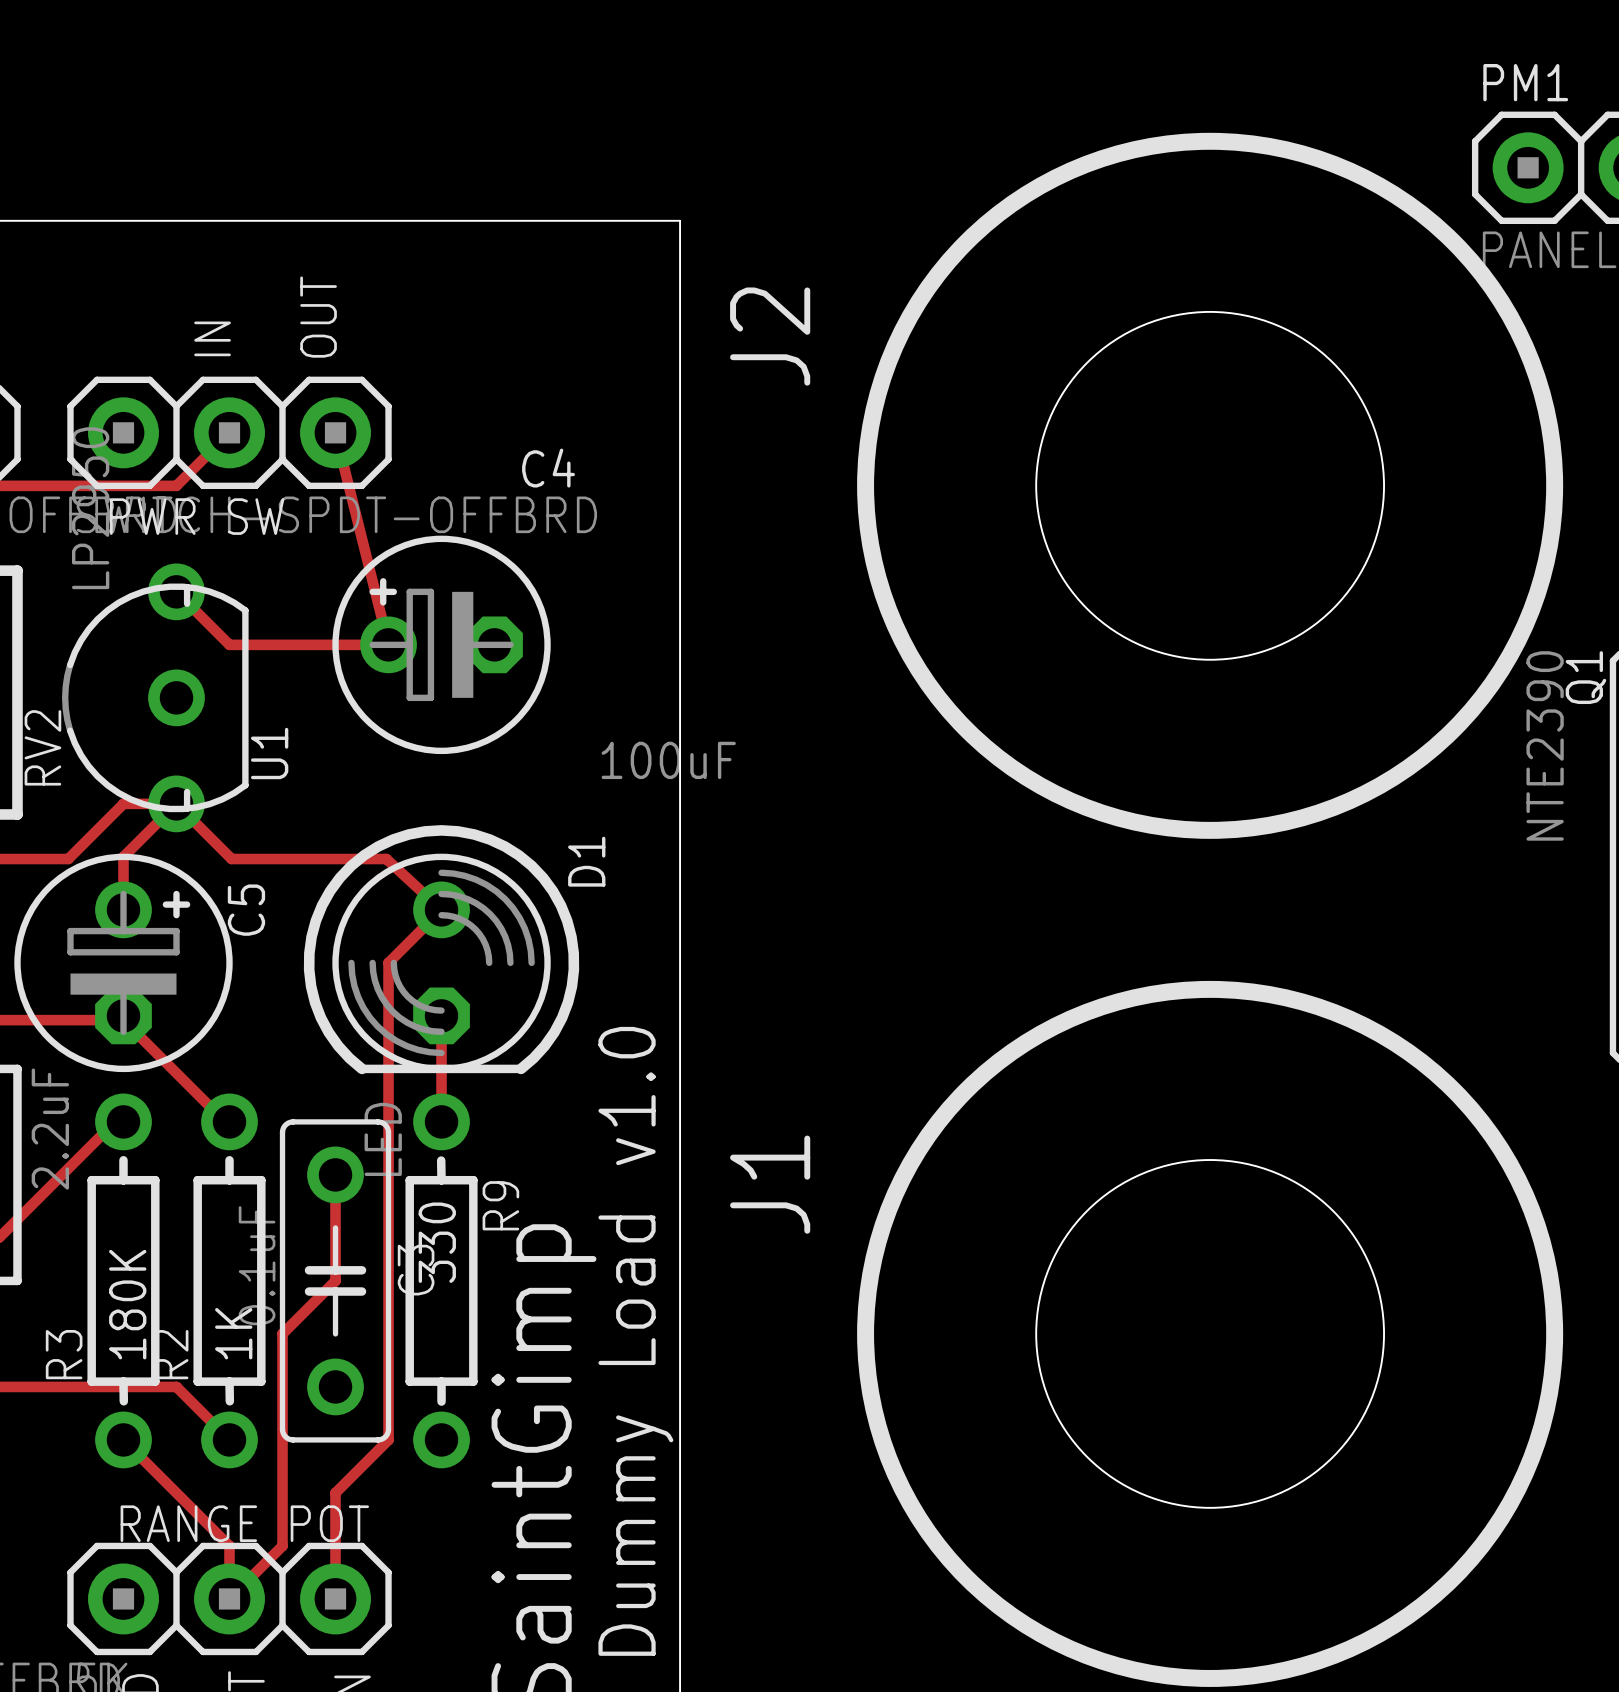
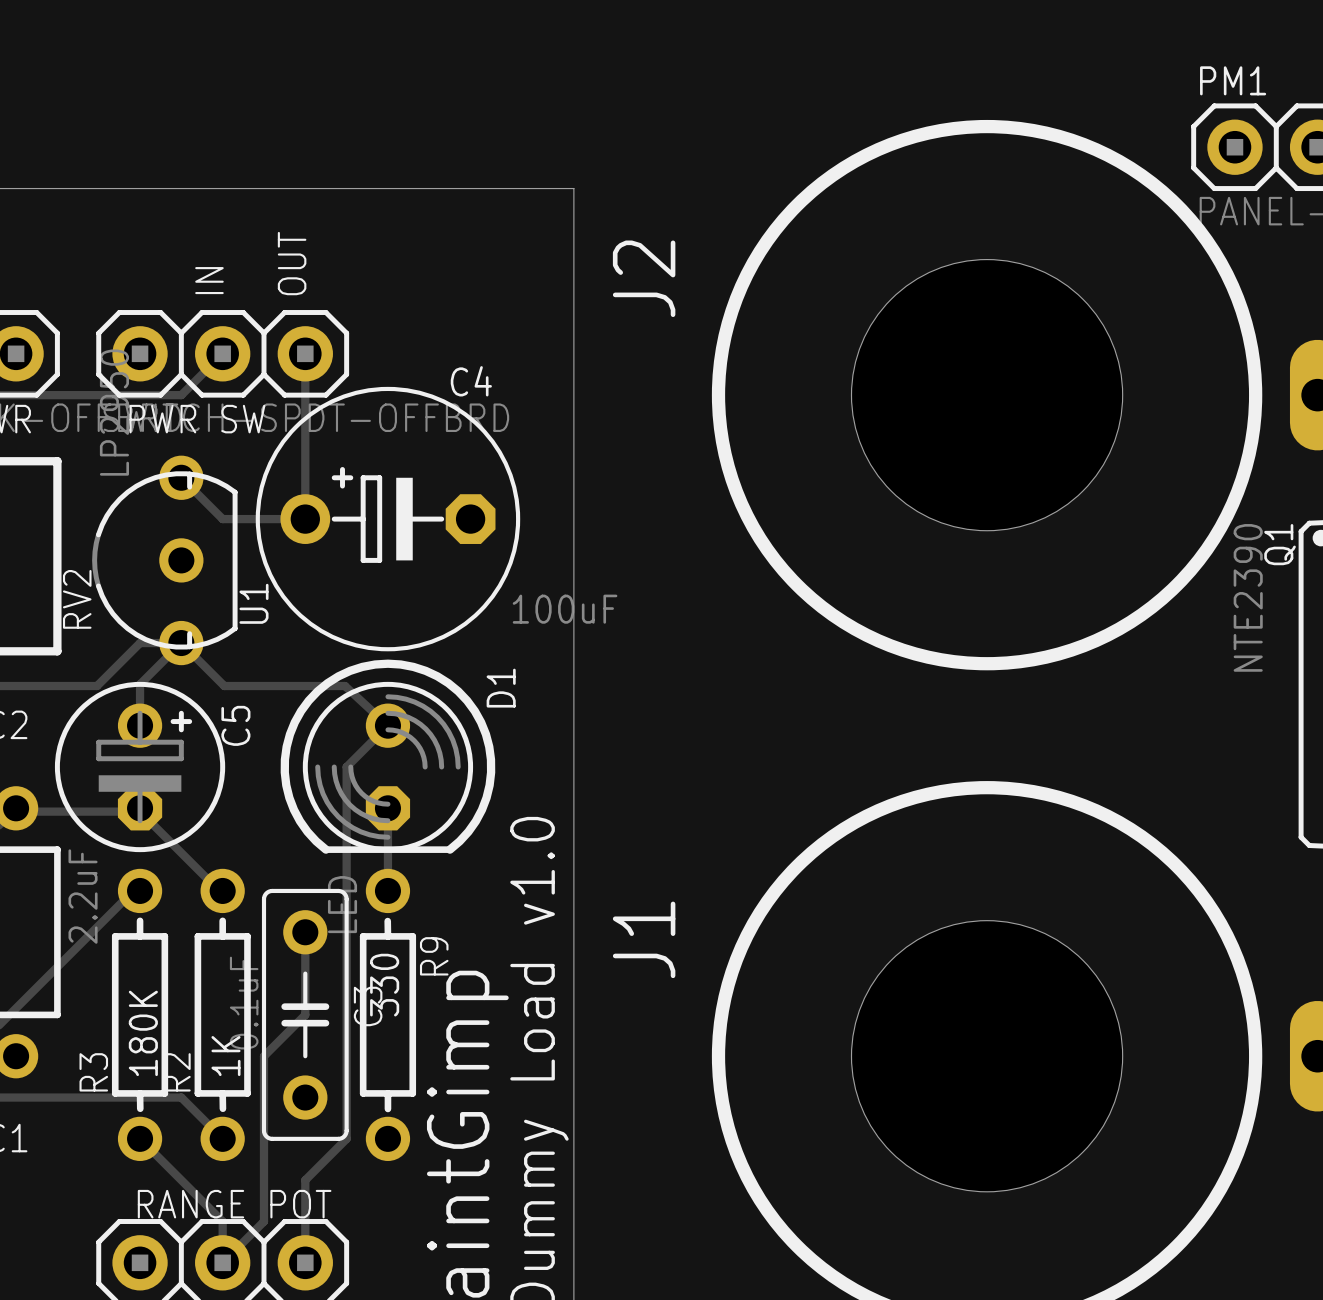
track: (335, 432) (388, 644) (335, 644) -> (305, 353) (305, 519)
C4 footprint: [332, 535, 551, 755] -> [255, 386, 521, 652]

